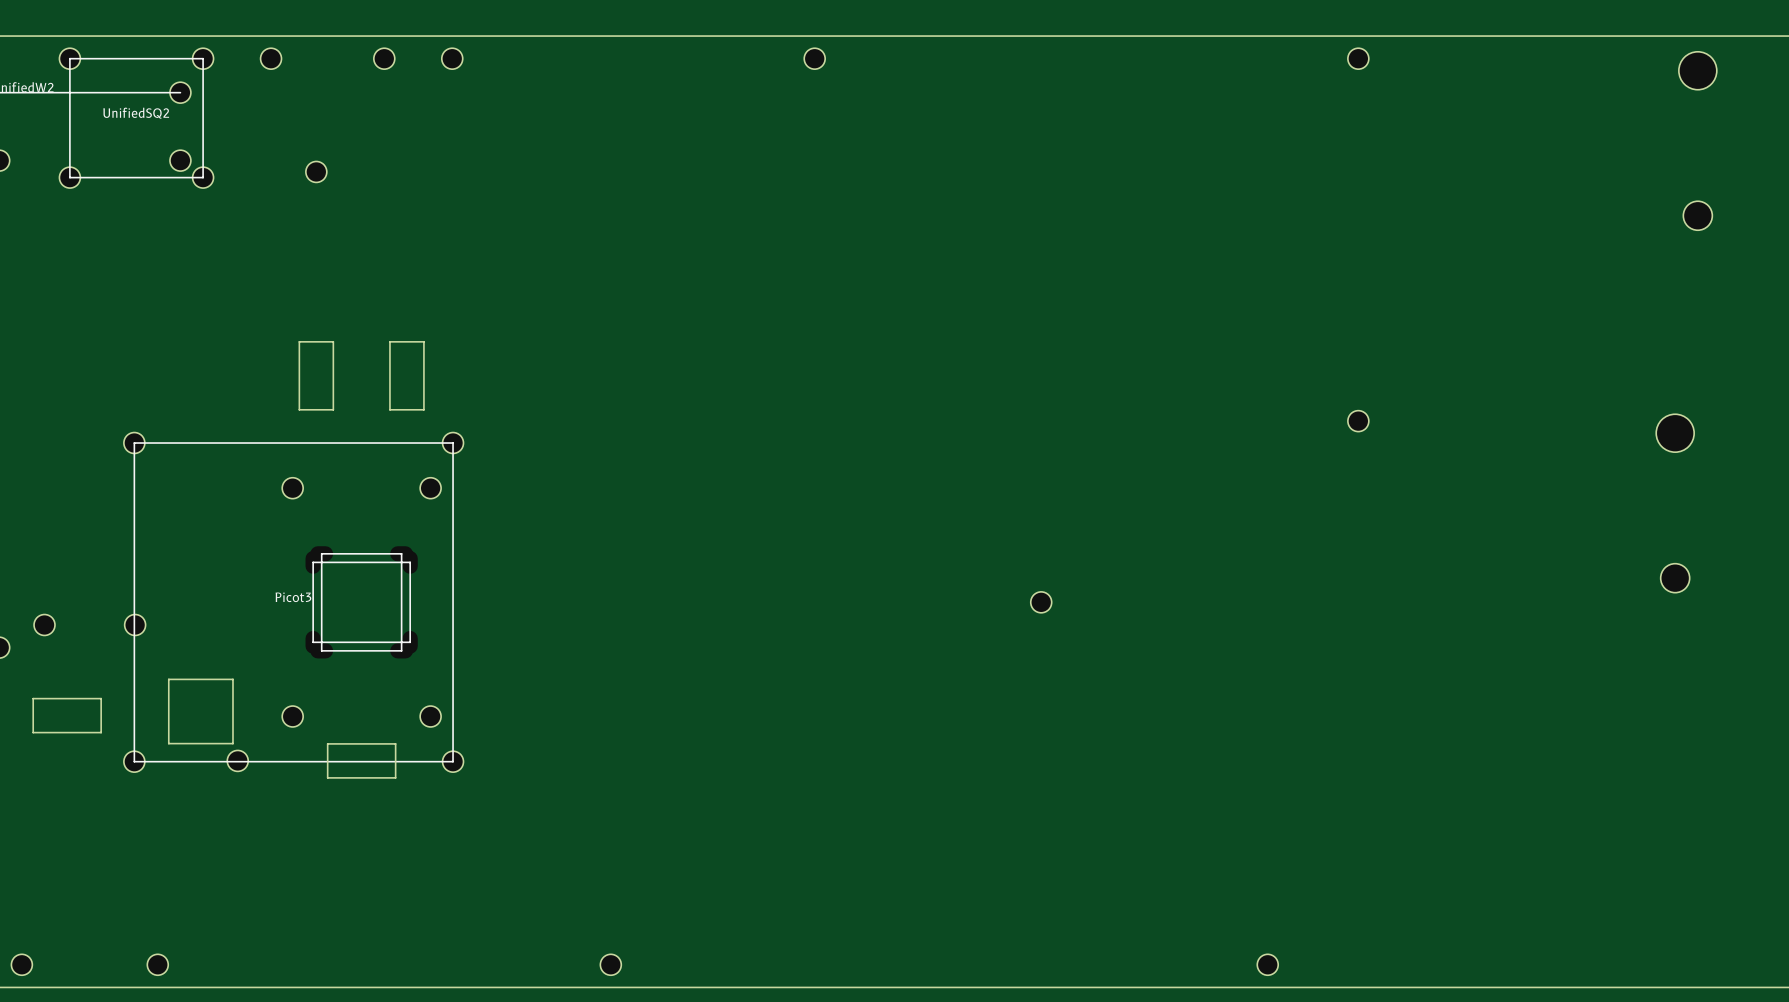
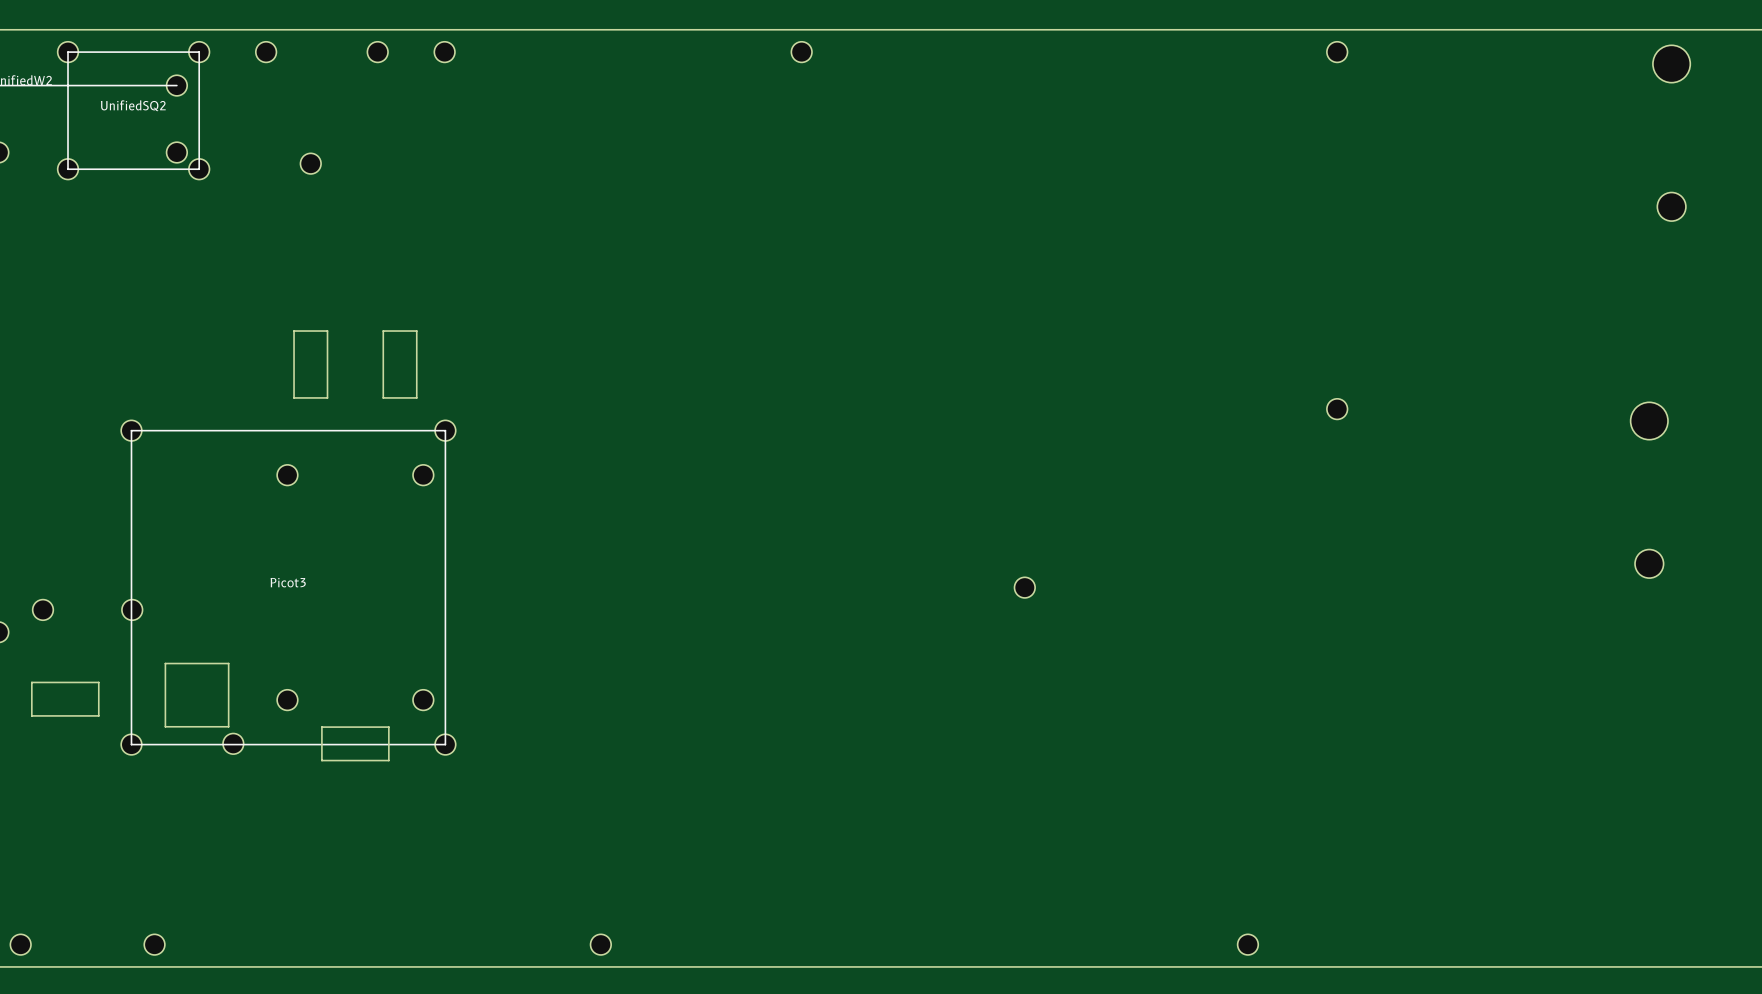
part: (361, 602) -> none
part: (361, 602) -> none

